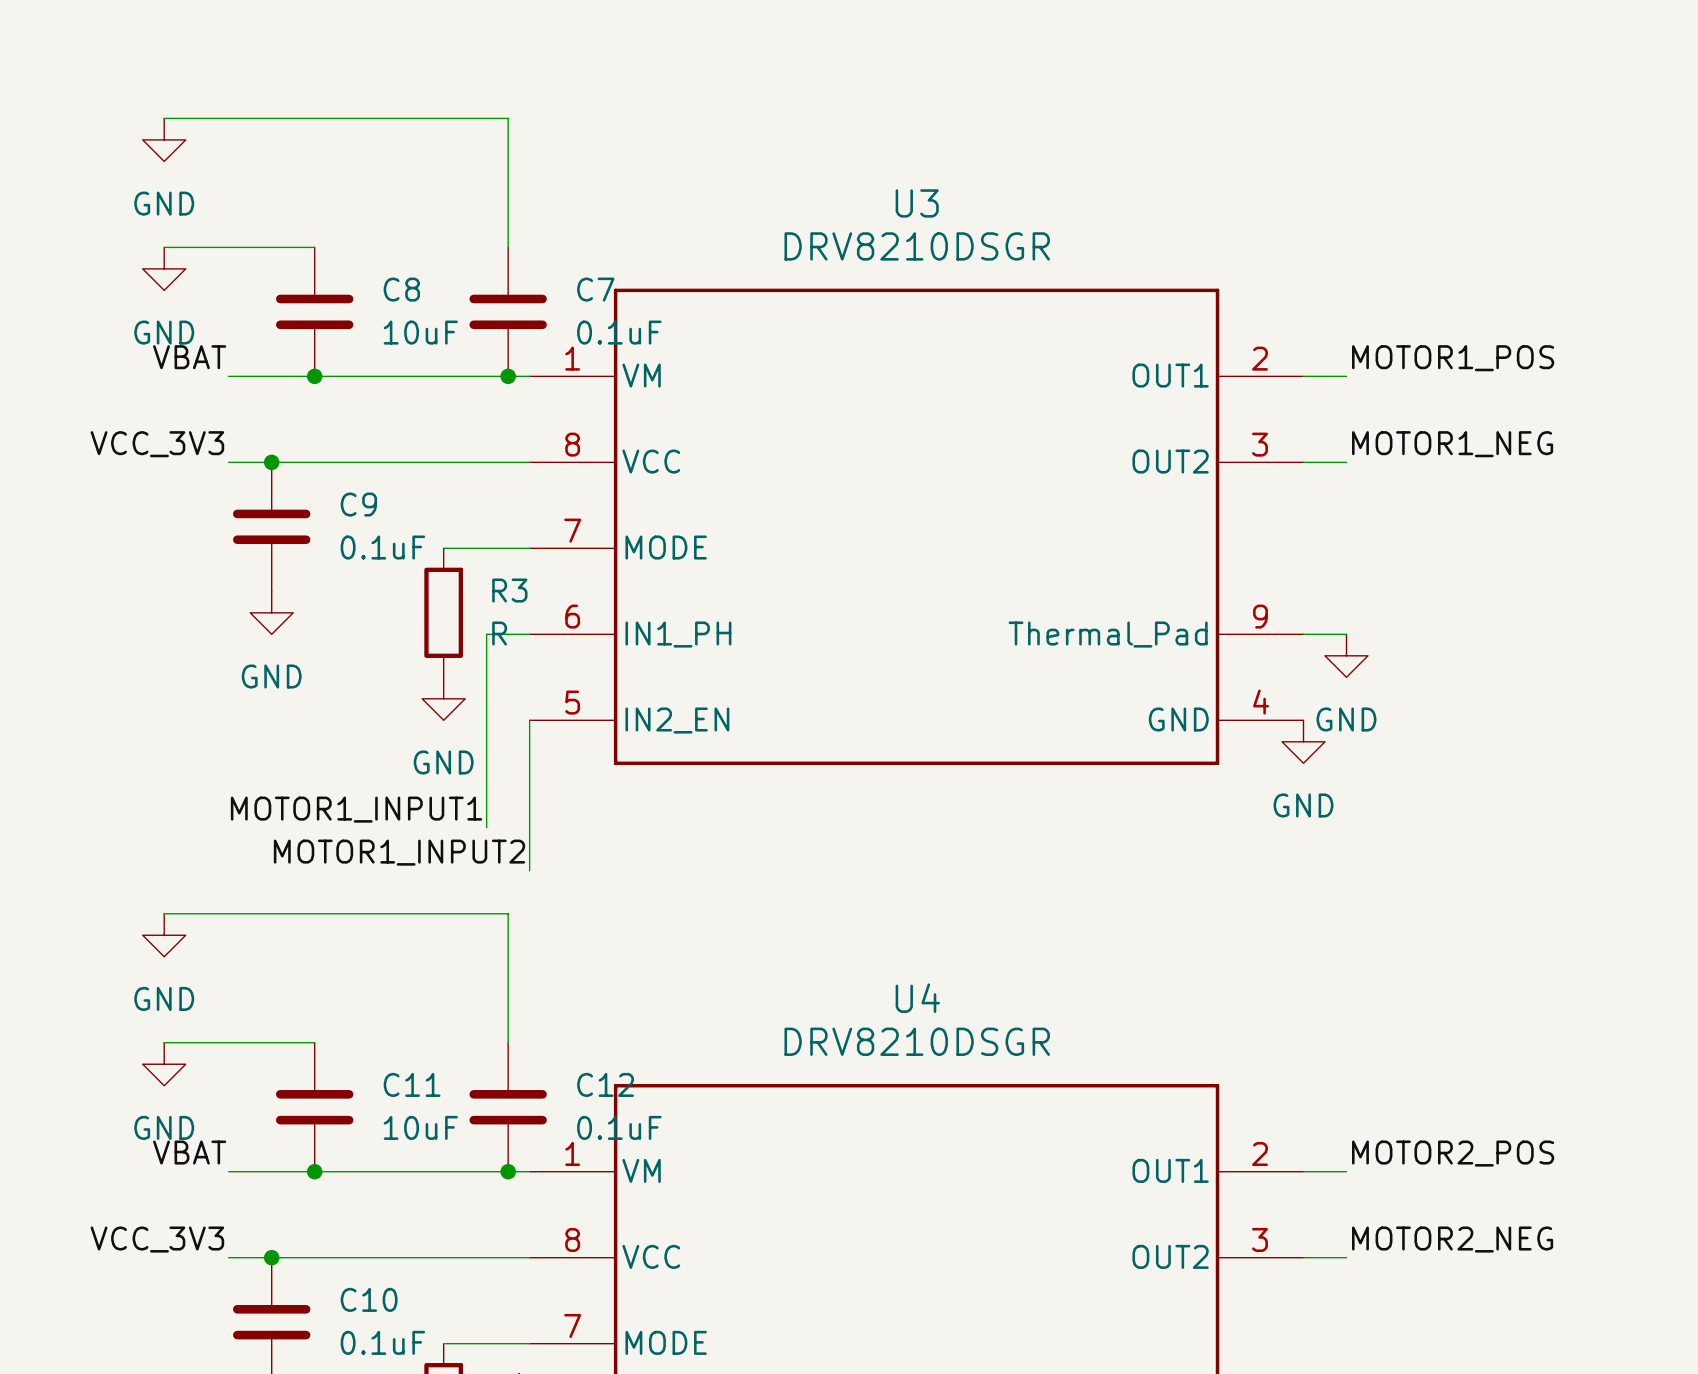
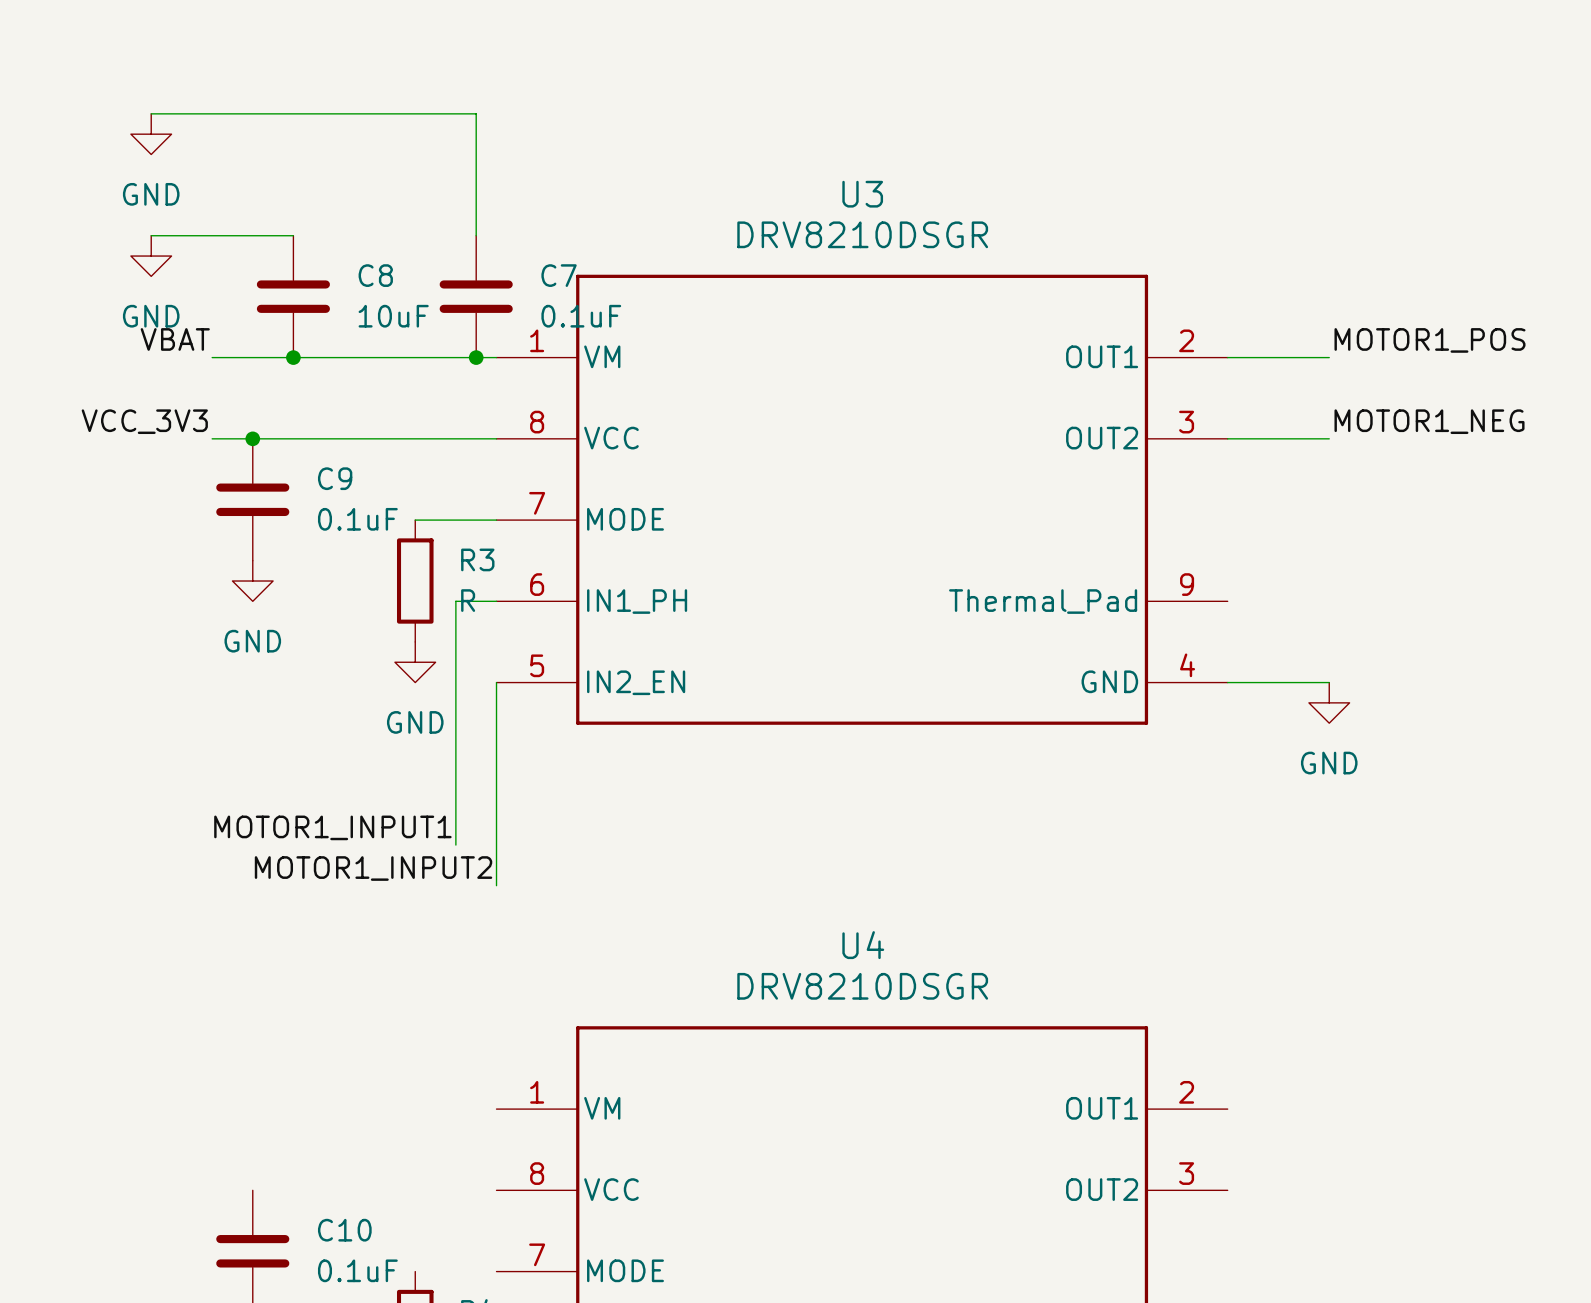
label position: MOTOR1_POS (1453, 358) -> MOTOR1_POS (1429, 340)
wire: none -> (1268, 357) (1329, 357)
label position: MOTOR1_NEG (1452, 444) -> MOTOR1_NEG (1429, 421)
wire: none -> (1268, 438) (1329, 438)
wire: (1303, 634) (1346, 634) -> none
power symbol: GND (1346, 655) -> none
wire: none -> (1227, 682) (1329, 682)
power symbol: GND (1303, 741) -> none
power symbol: none -> GND (1329, 702)
label position: MOTOR1_INPUT1 (356, 809) -> MOTOR1_INPUT1 (332, 827)
wire: none -> (455, 784) (455, 845)
label position: MOTOR1_INPUT2 (399, 852) -> MOTOR1_INPUT2 (373, 868)
wire: none -> (496, 824) (496, 885)
wire: (164, 913) (508, 913) (508, 1042) -> none
power symbol: GND (164, 935) -> none
wire: (164, 1042) (314, 1042) -> none
power symbol: GND (164, 1064) -> none
C11: 10uF (314, 1107) -> none
C12: 0.1uF (508, 1107) -> none
label: VBAT (189, 1152) -> none
label: MOTOR2_POS (1453, 1153) -> none
wire: (228, 1171) (529, 1171) -> none
junction: (314, 1171) -> none
junction: (508, 1171) -> none
wire: (1303, 1171) (1346, 1171) -> none
label: VCC_3V3 (157, 1239) -> none
label: MOTOR2_NEG (1452, 1239) -> none
wire: (228, 1257) (529, 1257) -> none
junction: (271, 1257) -> none
wire: (1303, 1257) (1346, 1257) -> none
wire: (443, 1343) (529, 1343) -> none

